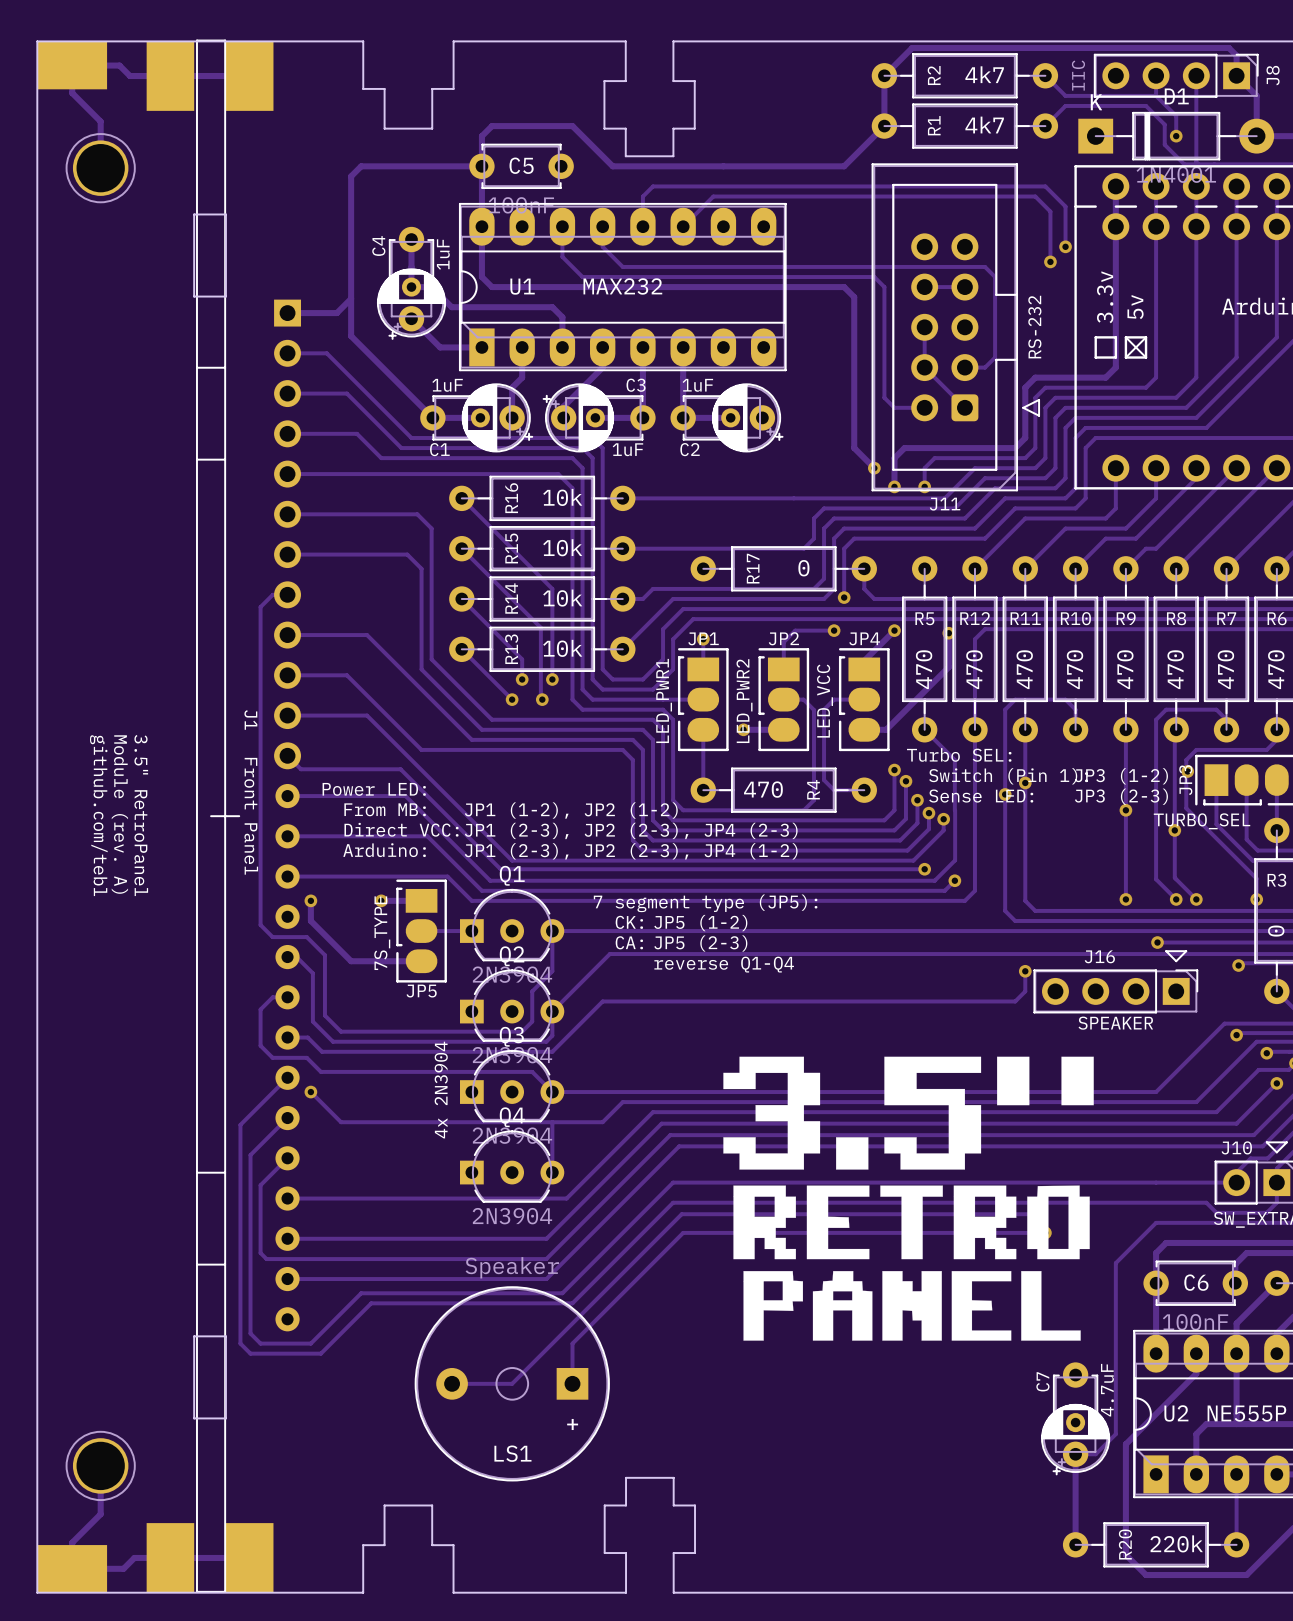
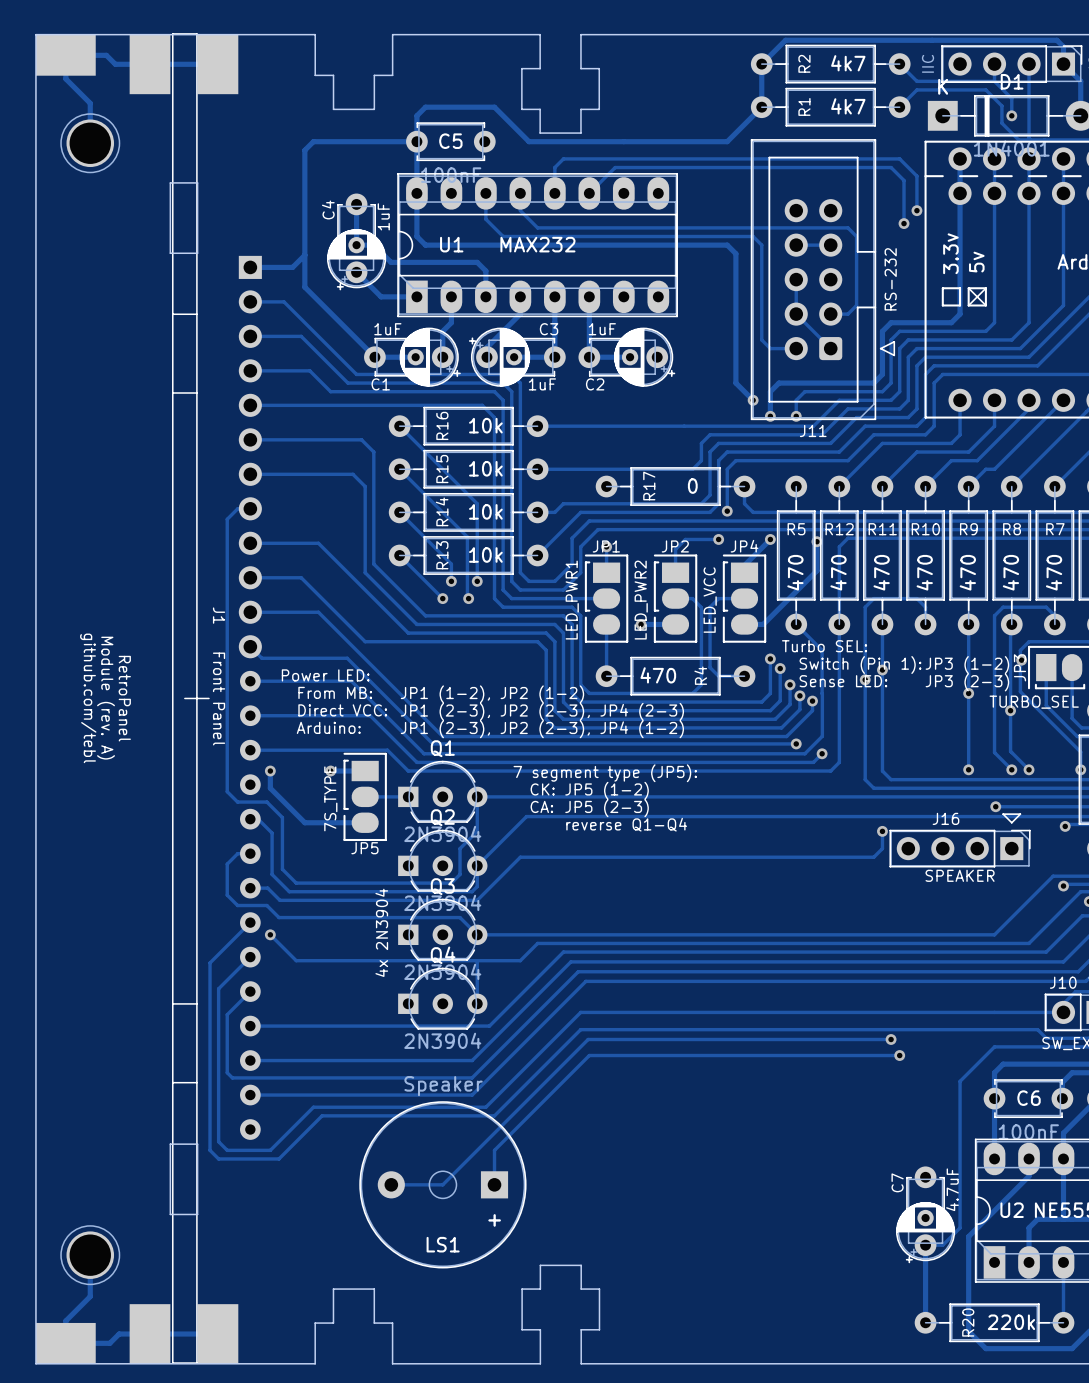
text: 3.5" RetroPanel (141, 815) -> RetroPanel (124, 698)
drawing: [723, 1056, 1094, 1341] -> none

